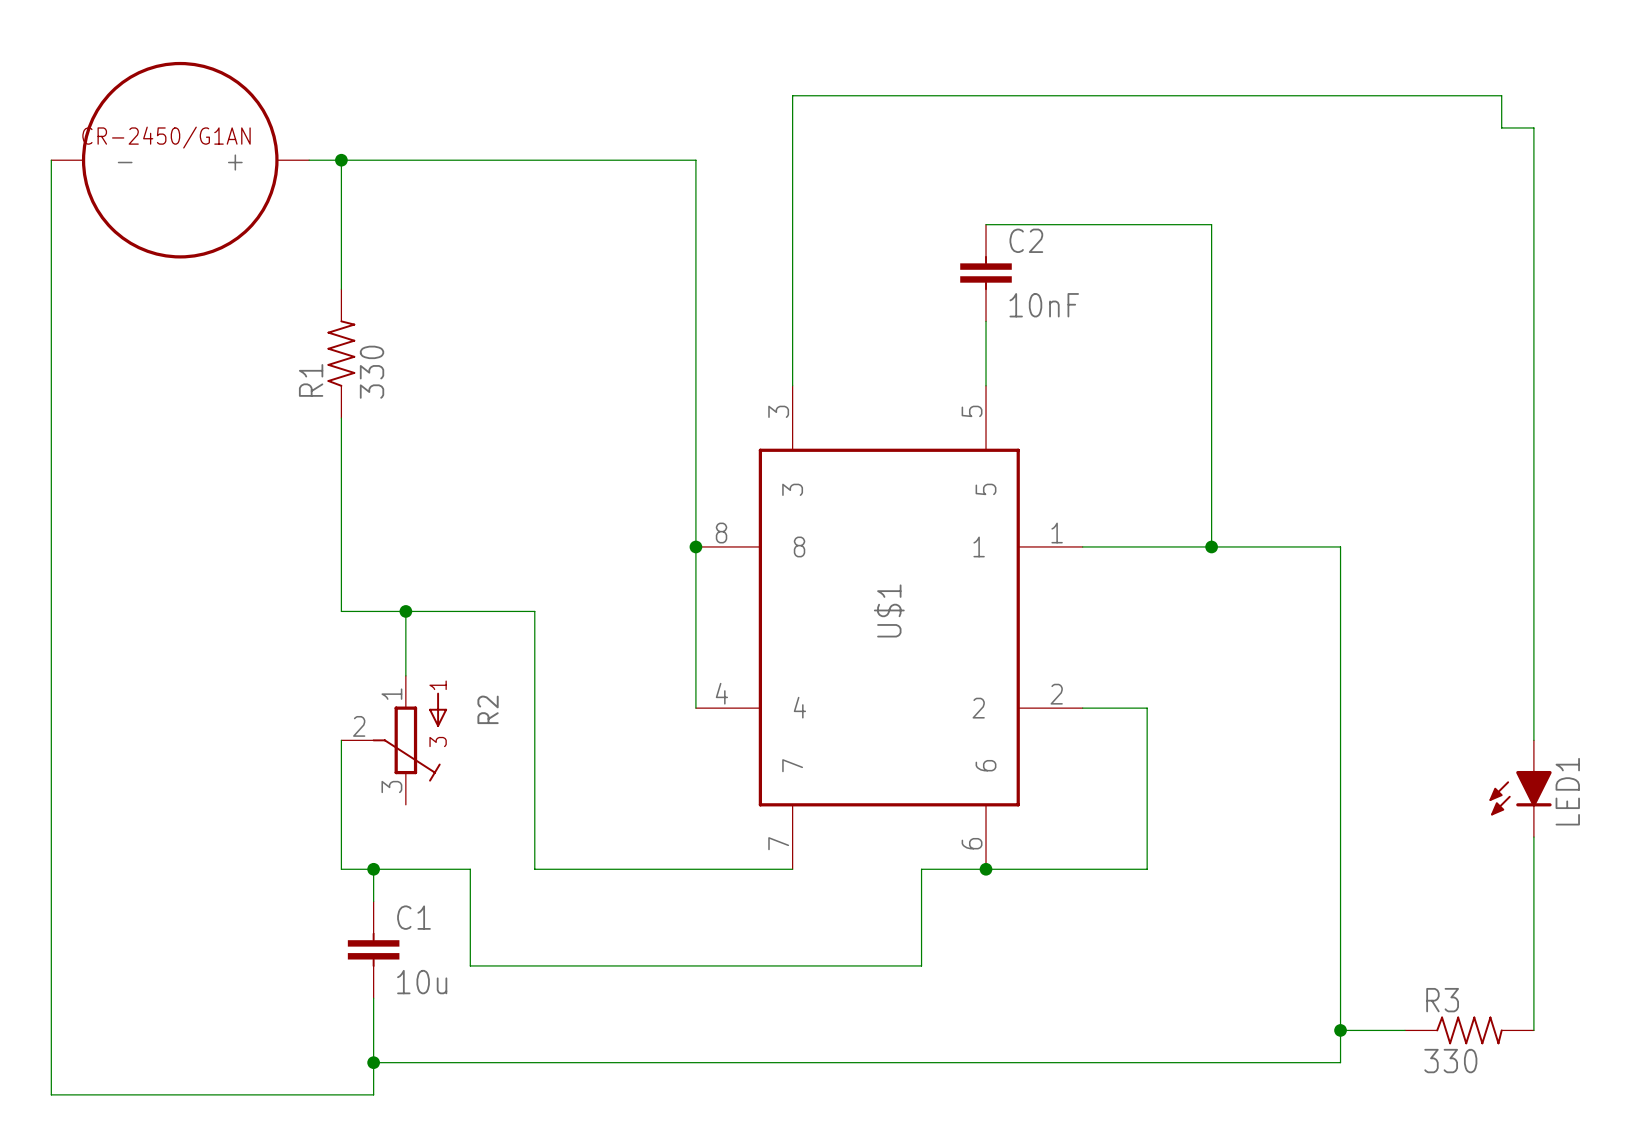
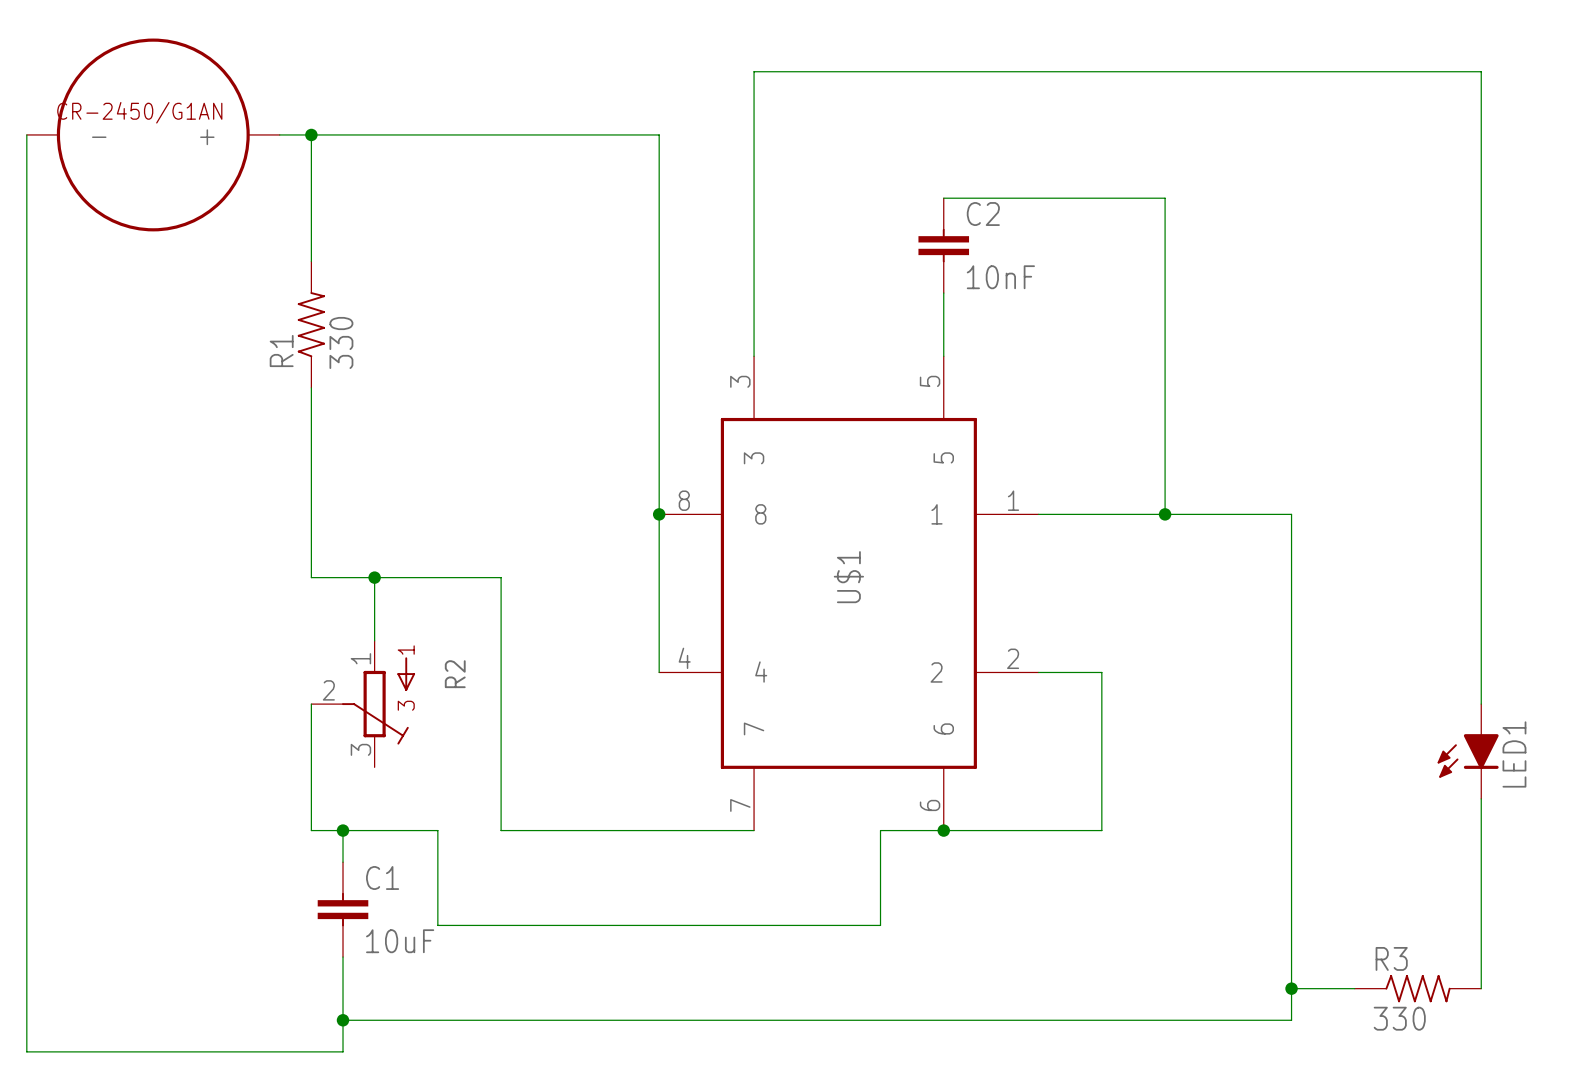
wire: (1501, 95) (1501, 127) (1533, 127) -> (1449, 71) (1481, 71) (1481, 103)
C1 value: 10u (422, 982) -> 10uF (400, 941)

